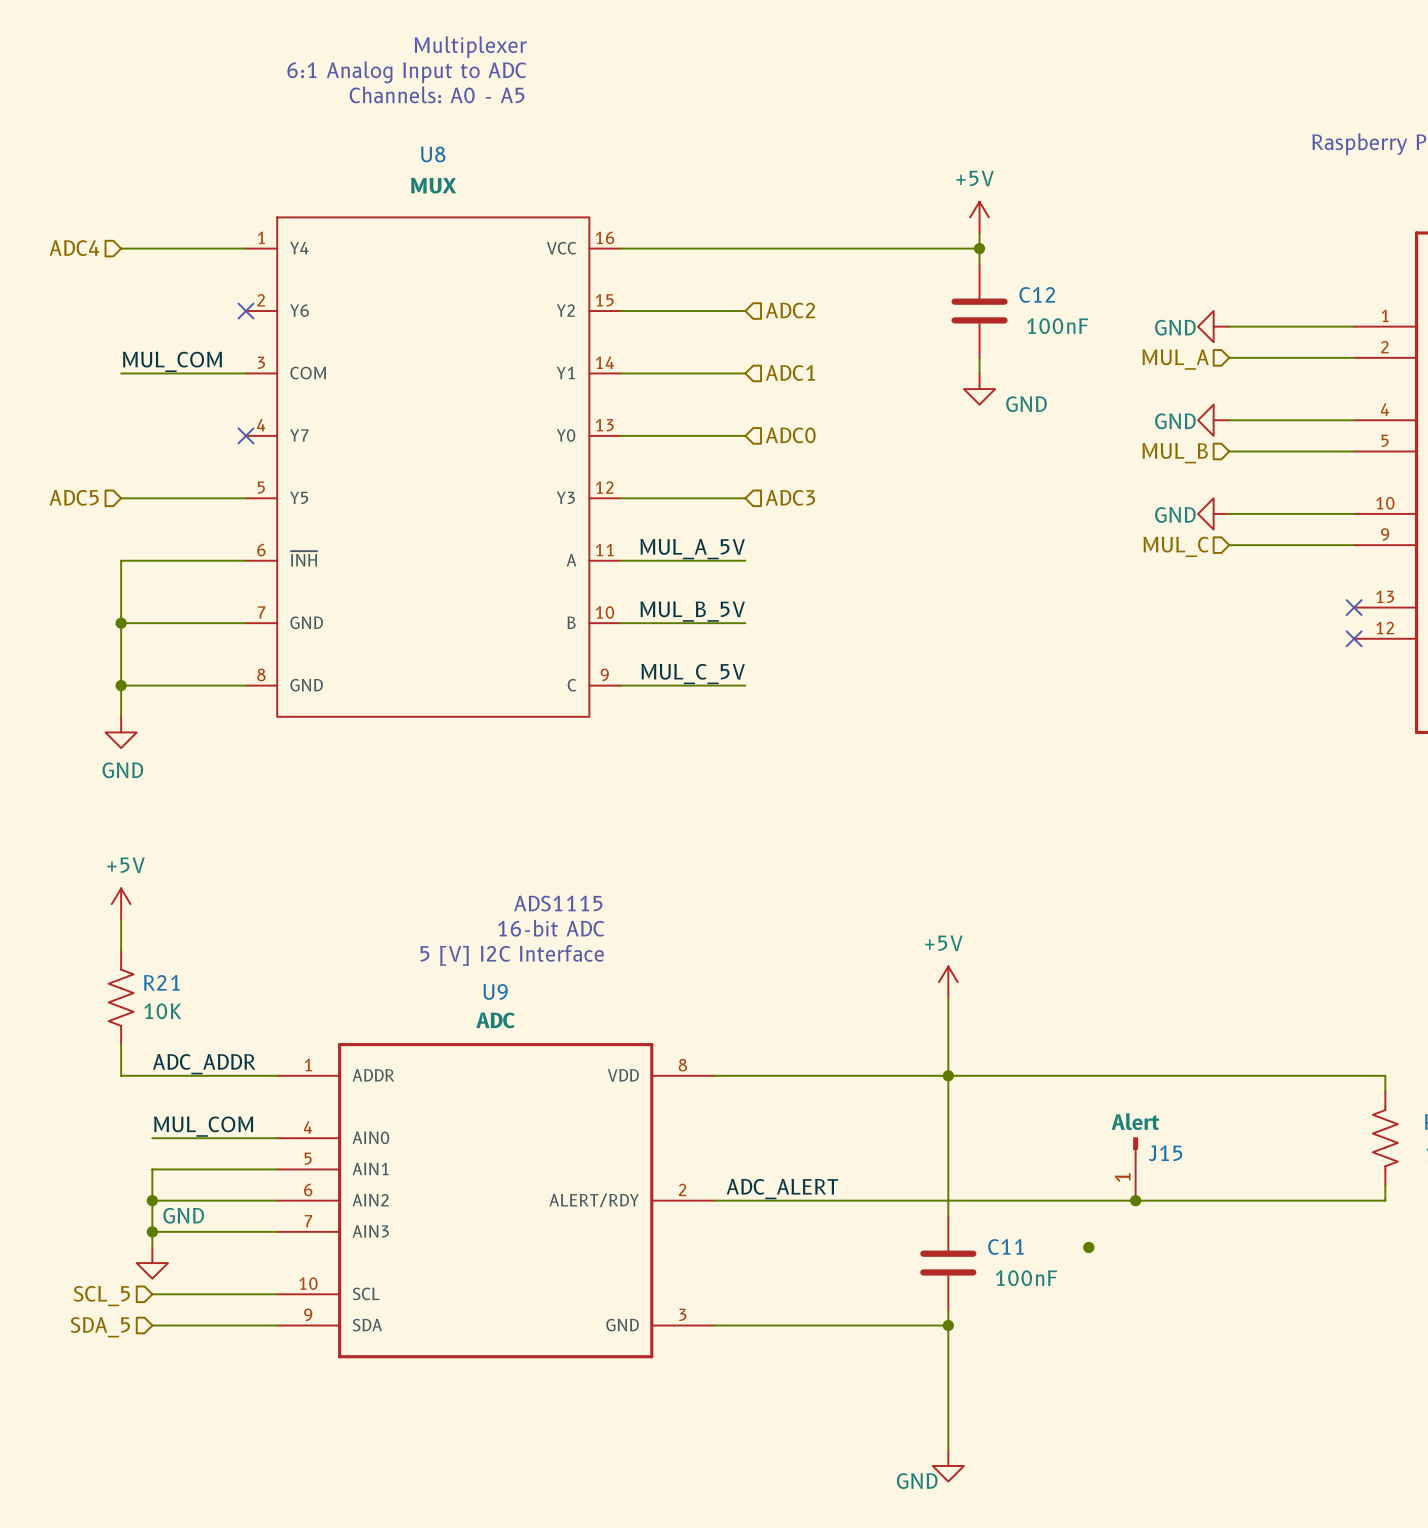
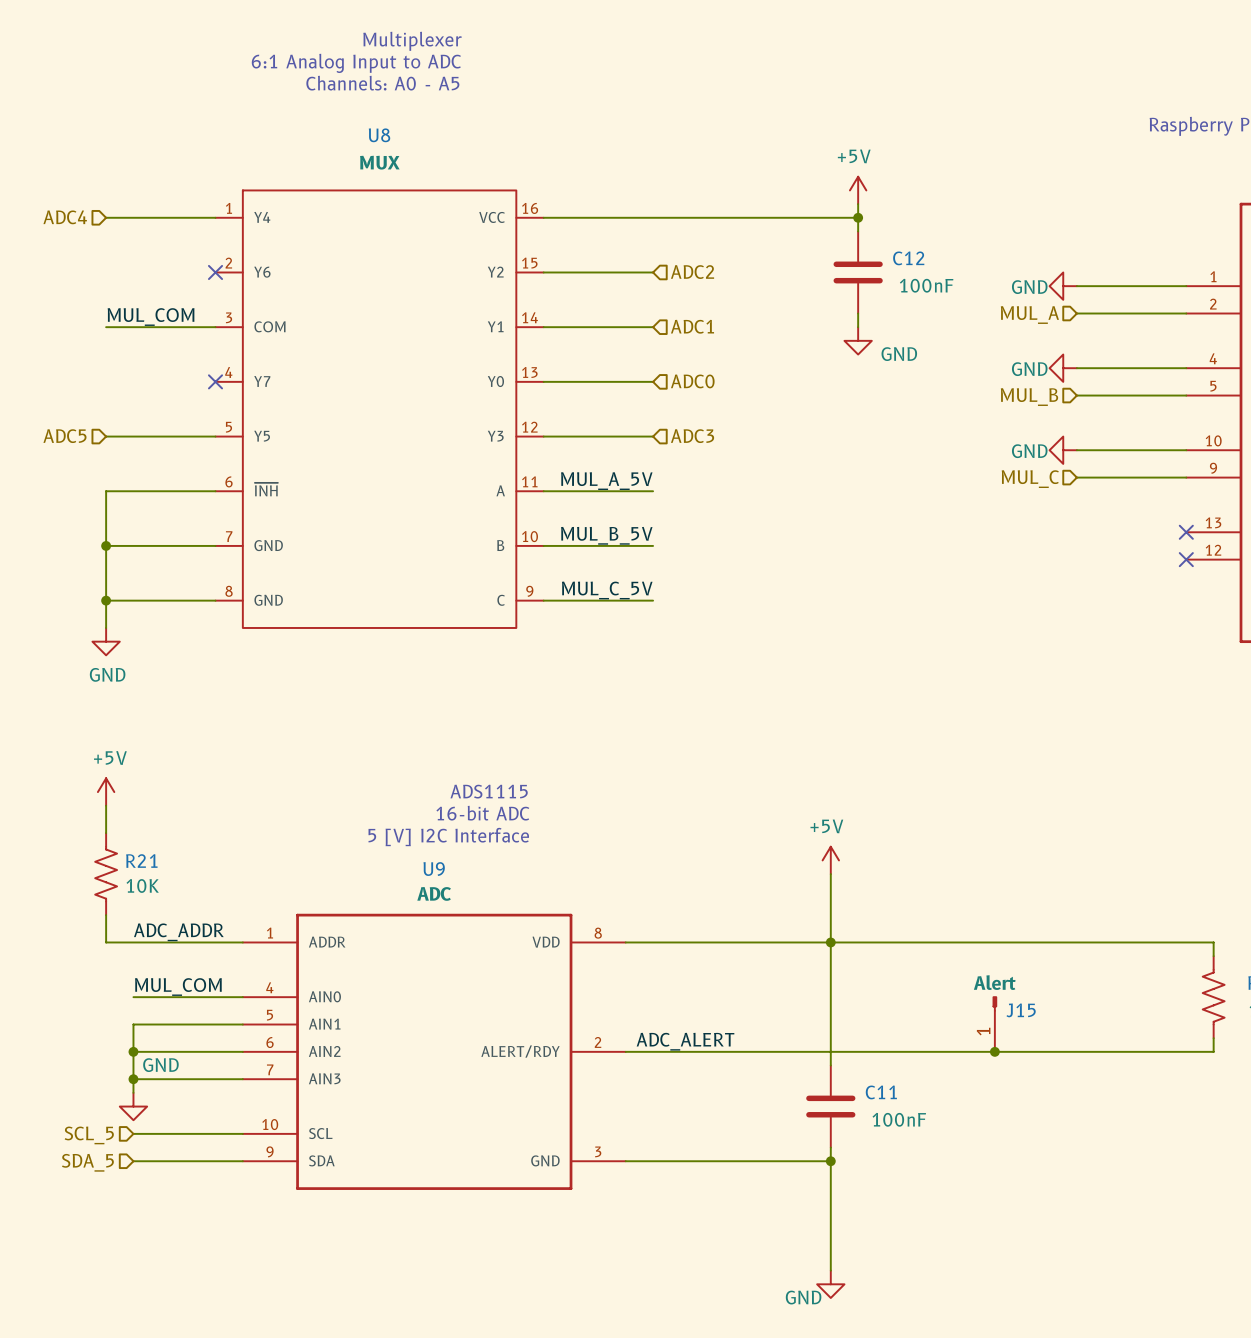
junction: (1088, 1247) -> none

